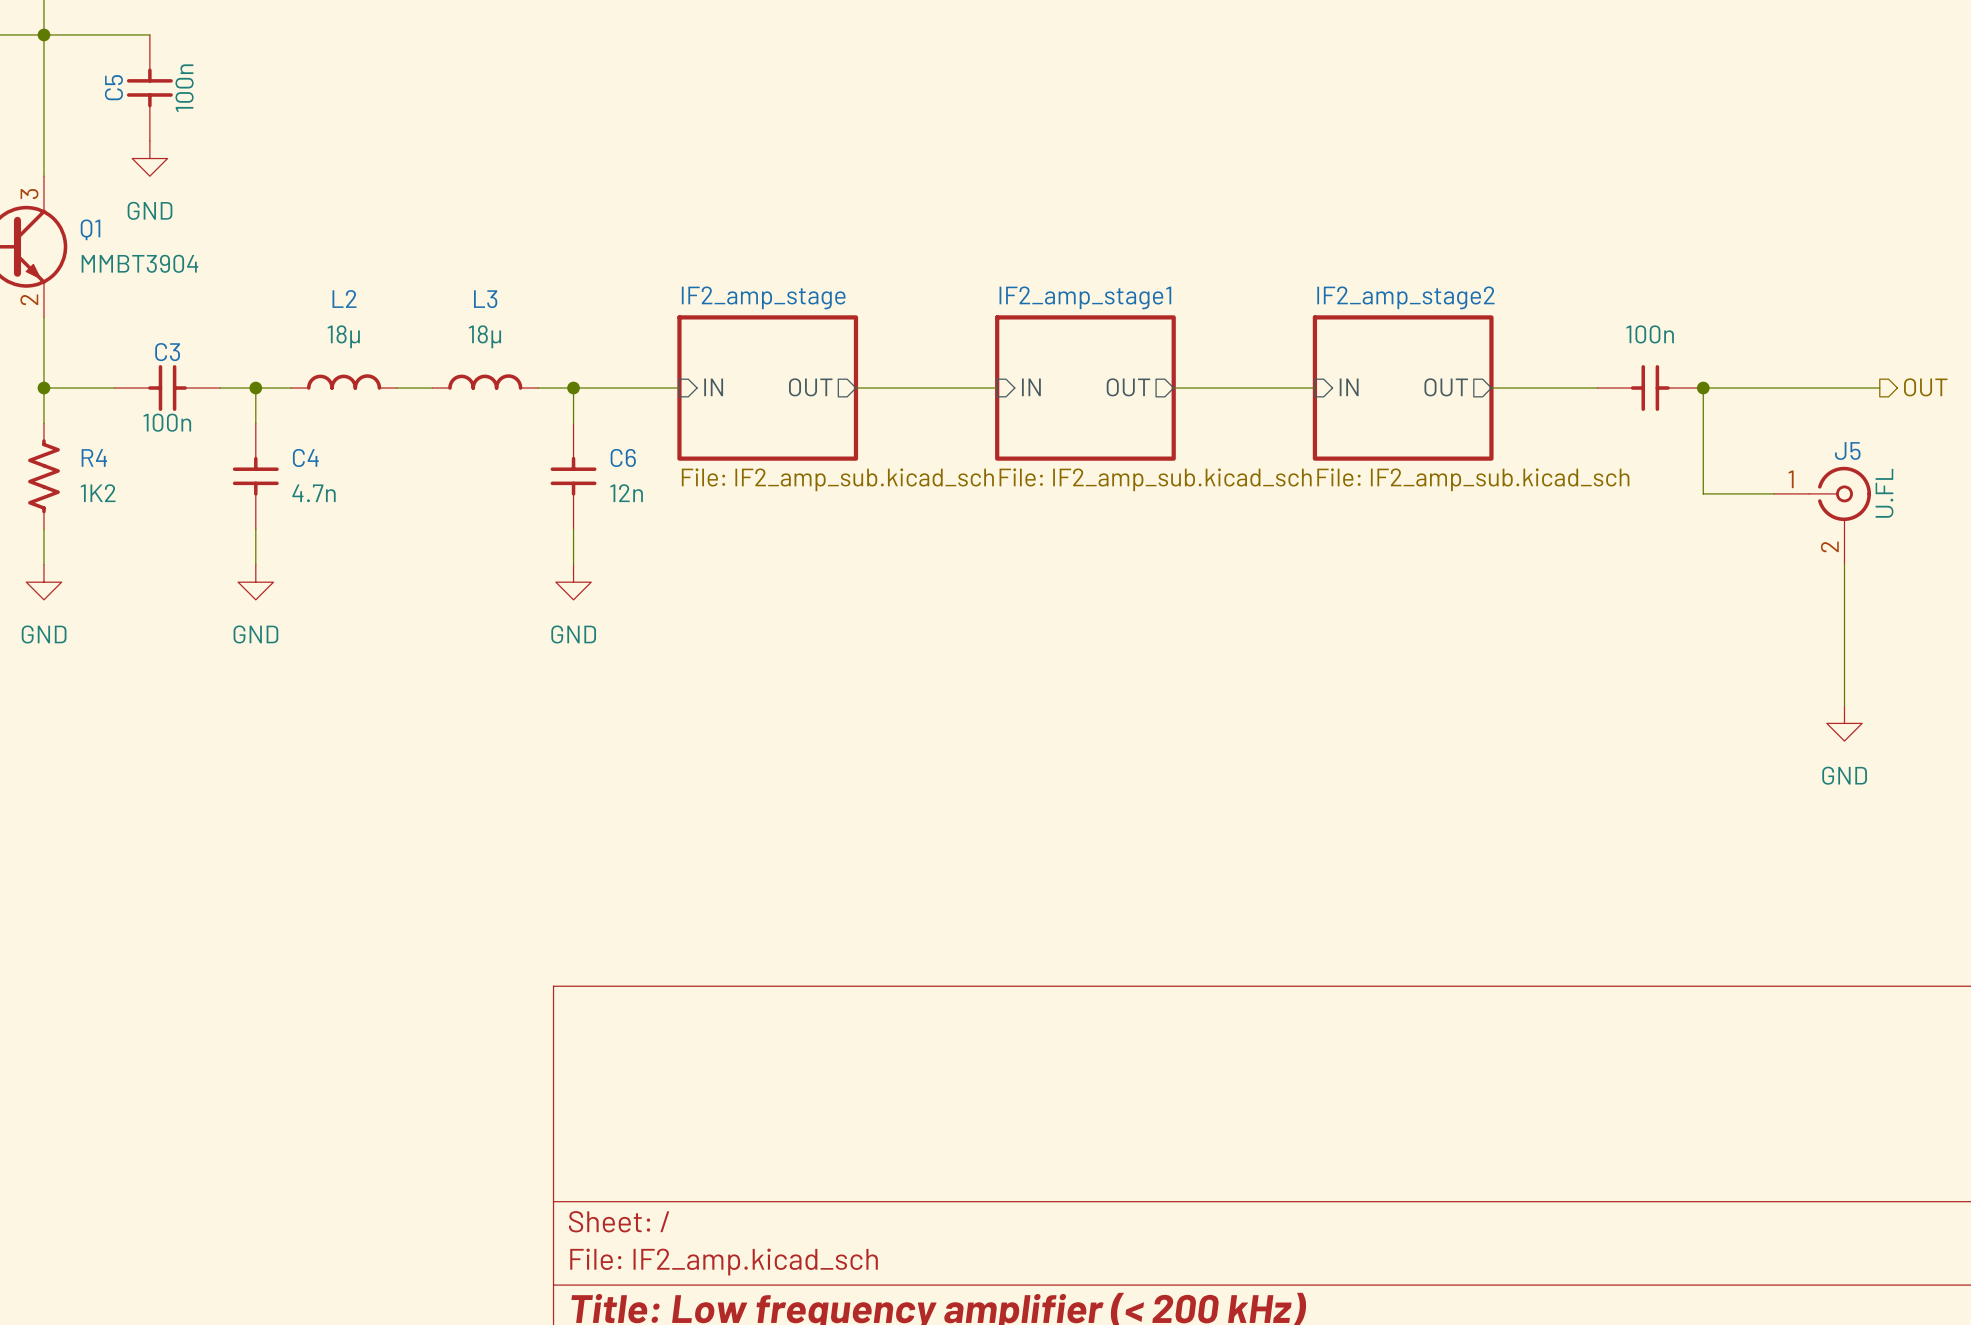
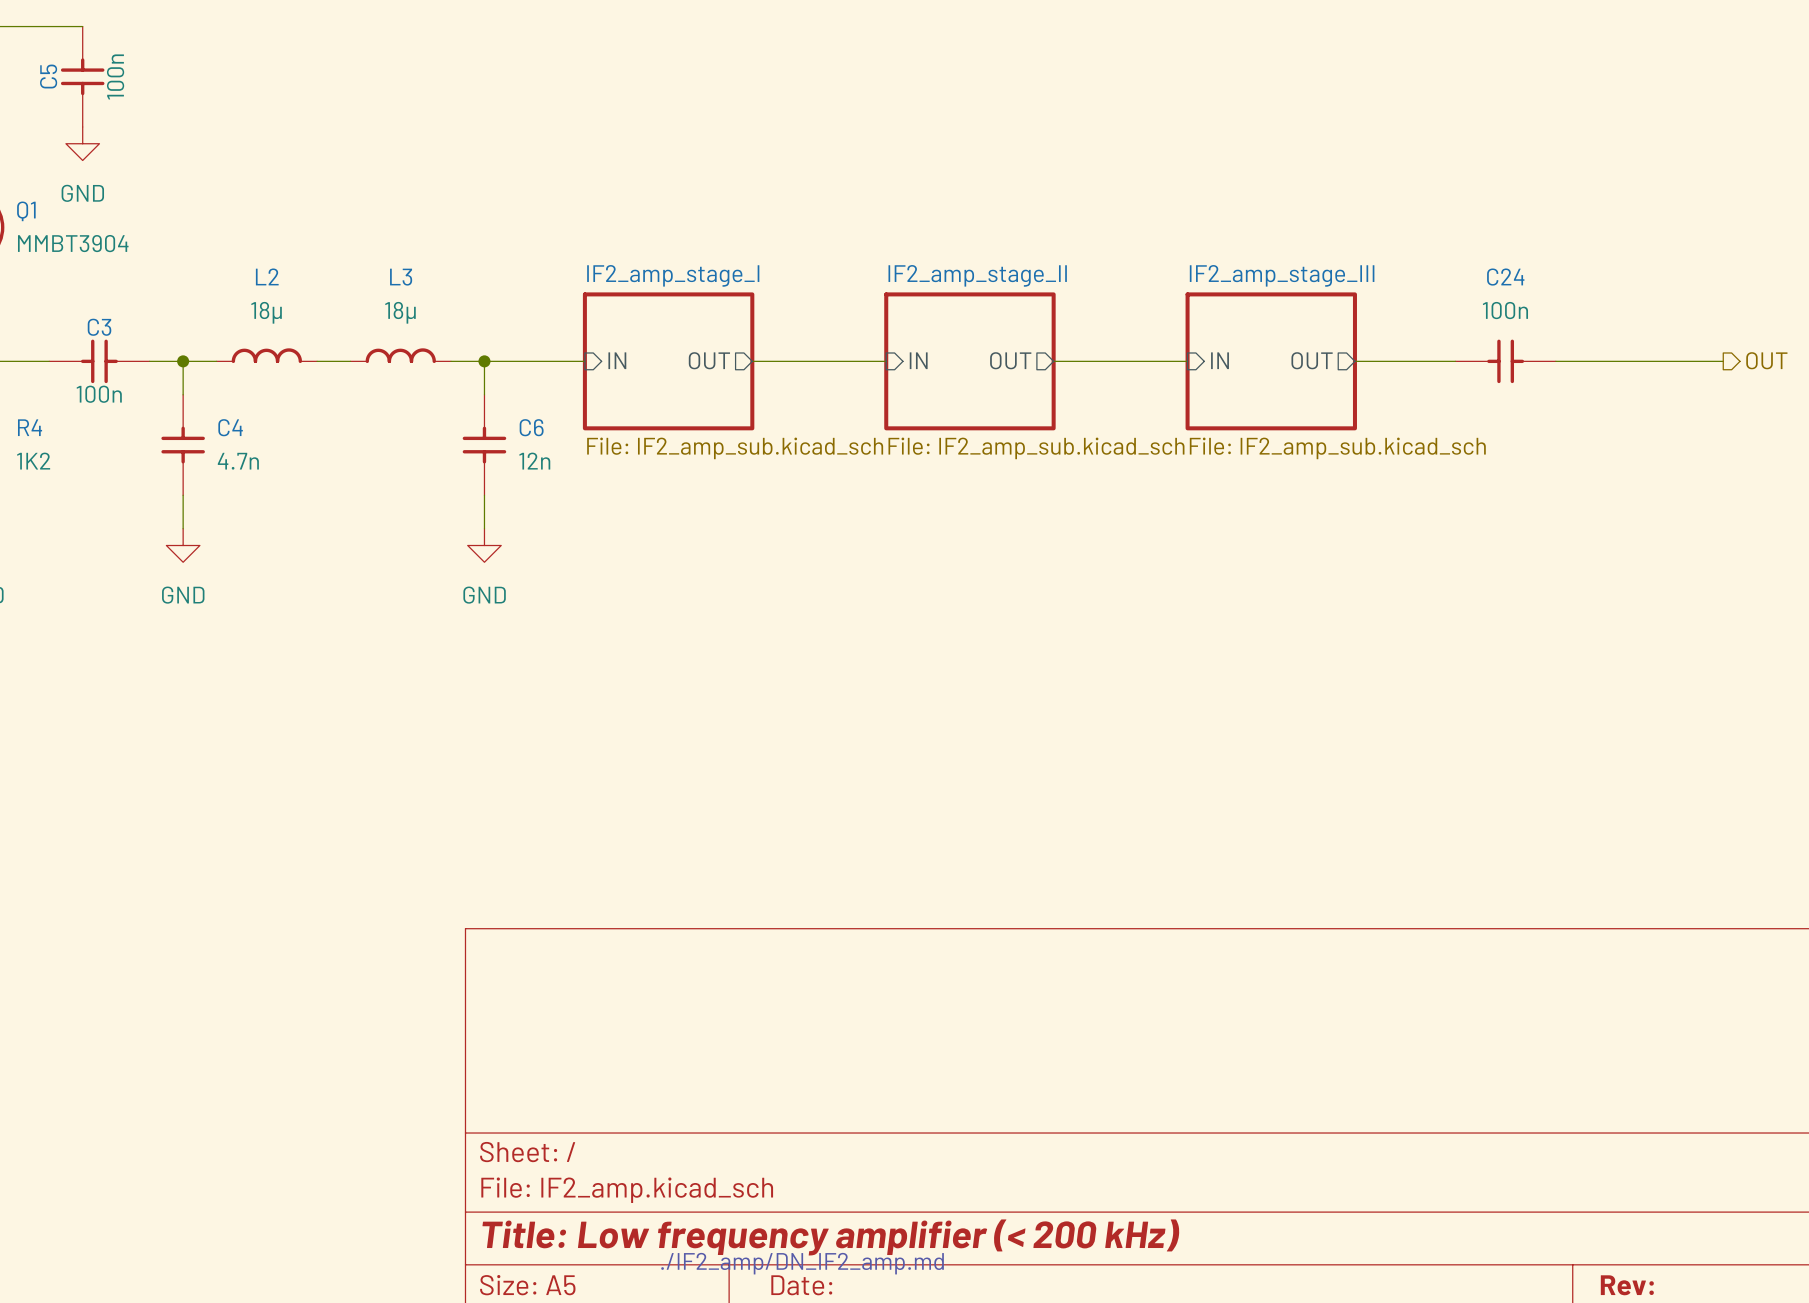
sheet IF2_amp_stage name: IF2_amp_stage (763, 297) -> IF2_amp_stage_I (673, 275)
sheet IF2_amp_stage1 name: IF2_amp_stage1 (1085, 297) -> IF2_amp_stage_II (977, 275)
sheet IF2_amp_stage2 name: IF2_amp_stage2 (1405, 297) -> IF2_amp_stage_III (1282, 275)
C24 name: none -> C24 (1505, 277)
wire: (1703, 388) (1703, 493) (1773, 493) -> none
junction: (1703, 388) -> none
J5: U.FL (1822, 515) -> none
wire: (1844, 564) (1844, 705) -> none
power symbol: GND (1844, 723) -> none

